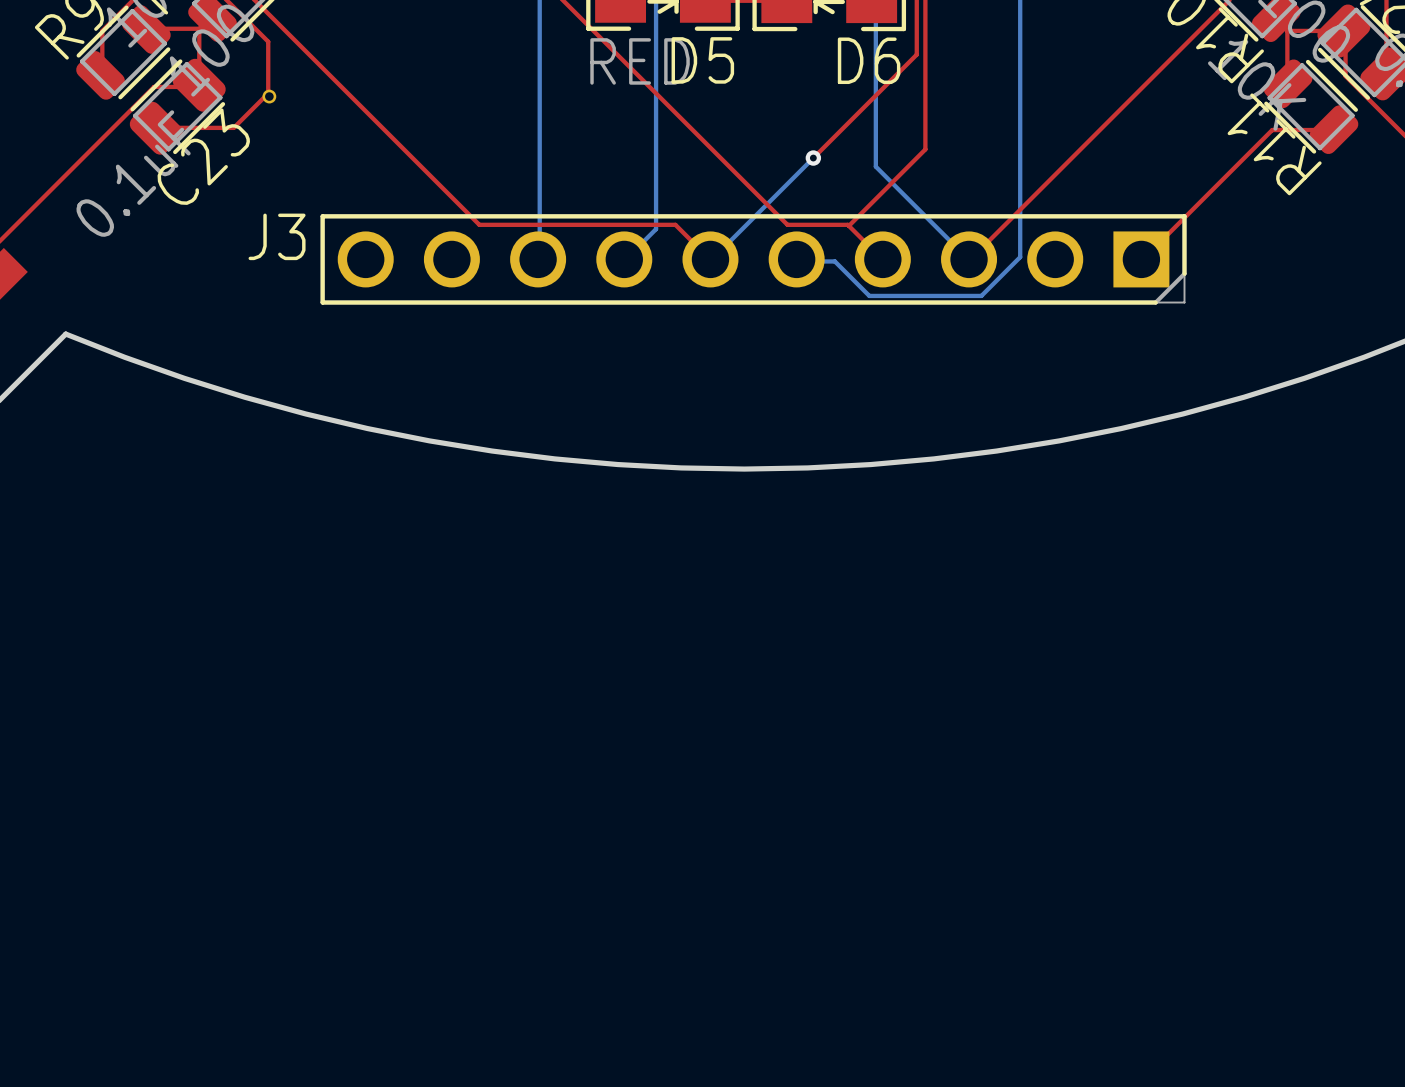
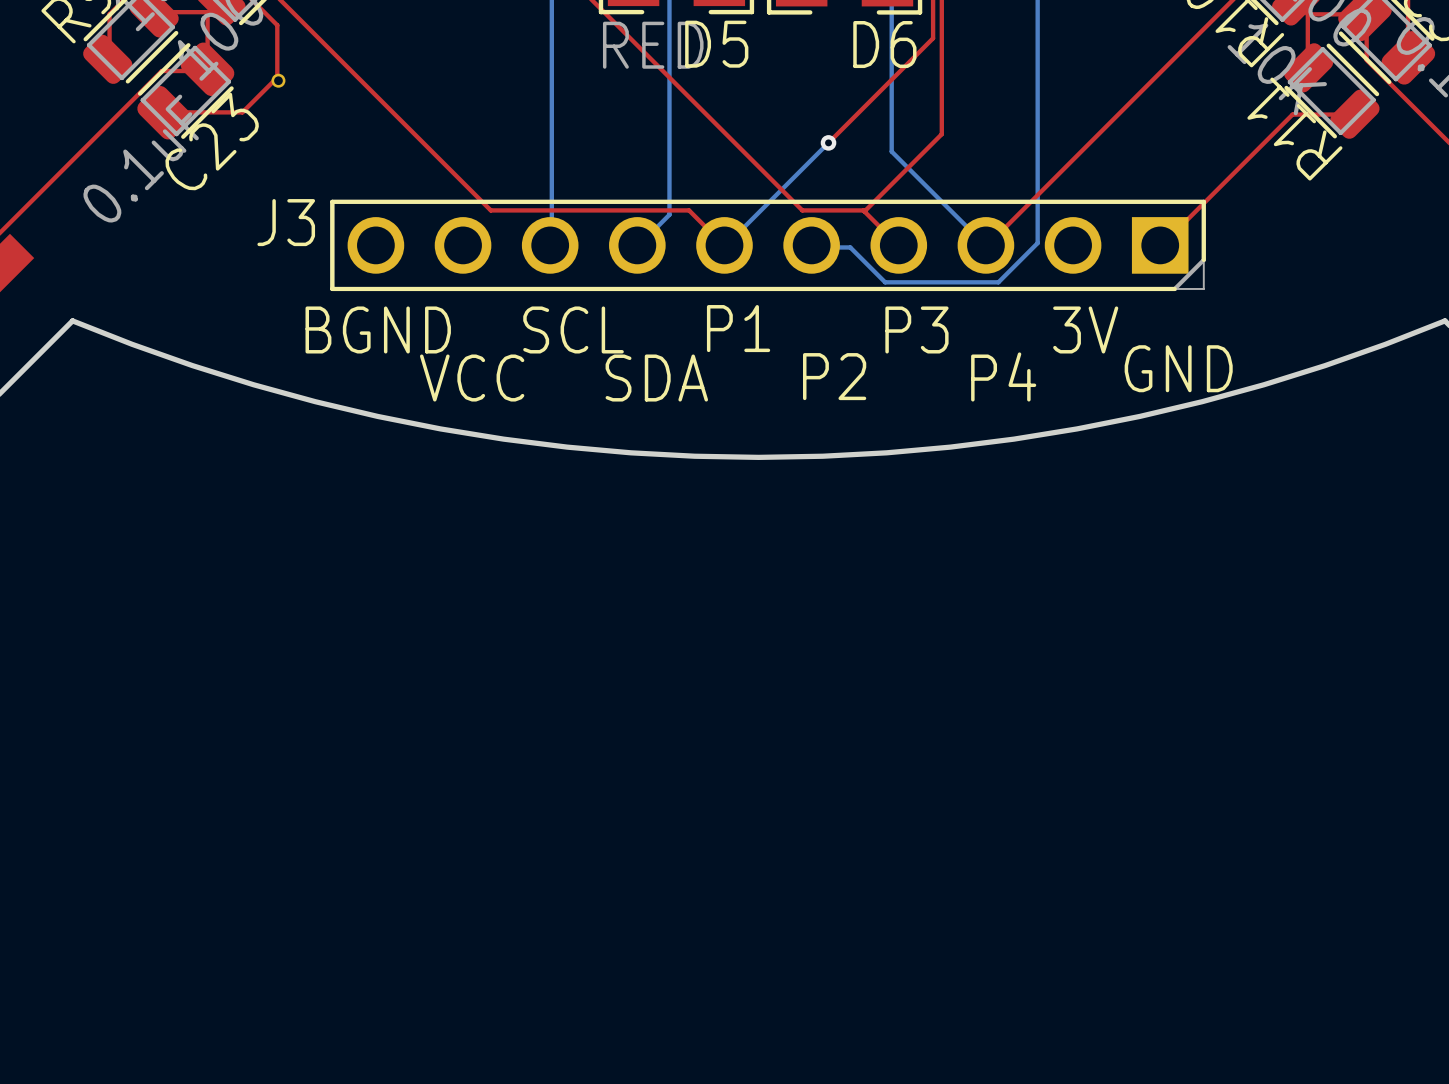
text: none -> P1 (738, 328)
text: none -> BGND (378, 329)
text: none -> SCL (573, 329)
text: none -> P3 (916, 329)
text: none -> 3V (1085, 329)
text: none -> GND (1178, 368)
text: none -> P2 (834, 376)
text: none -> P4 (1003, 376)
text: none -> VCC (472, 378)
text: none -> SDA (656, 378)

